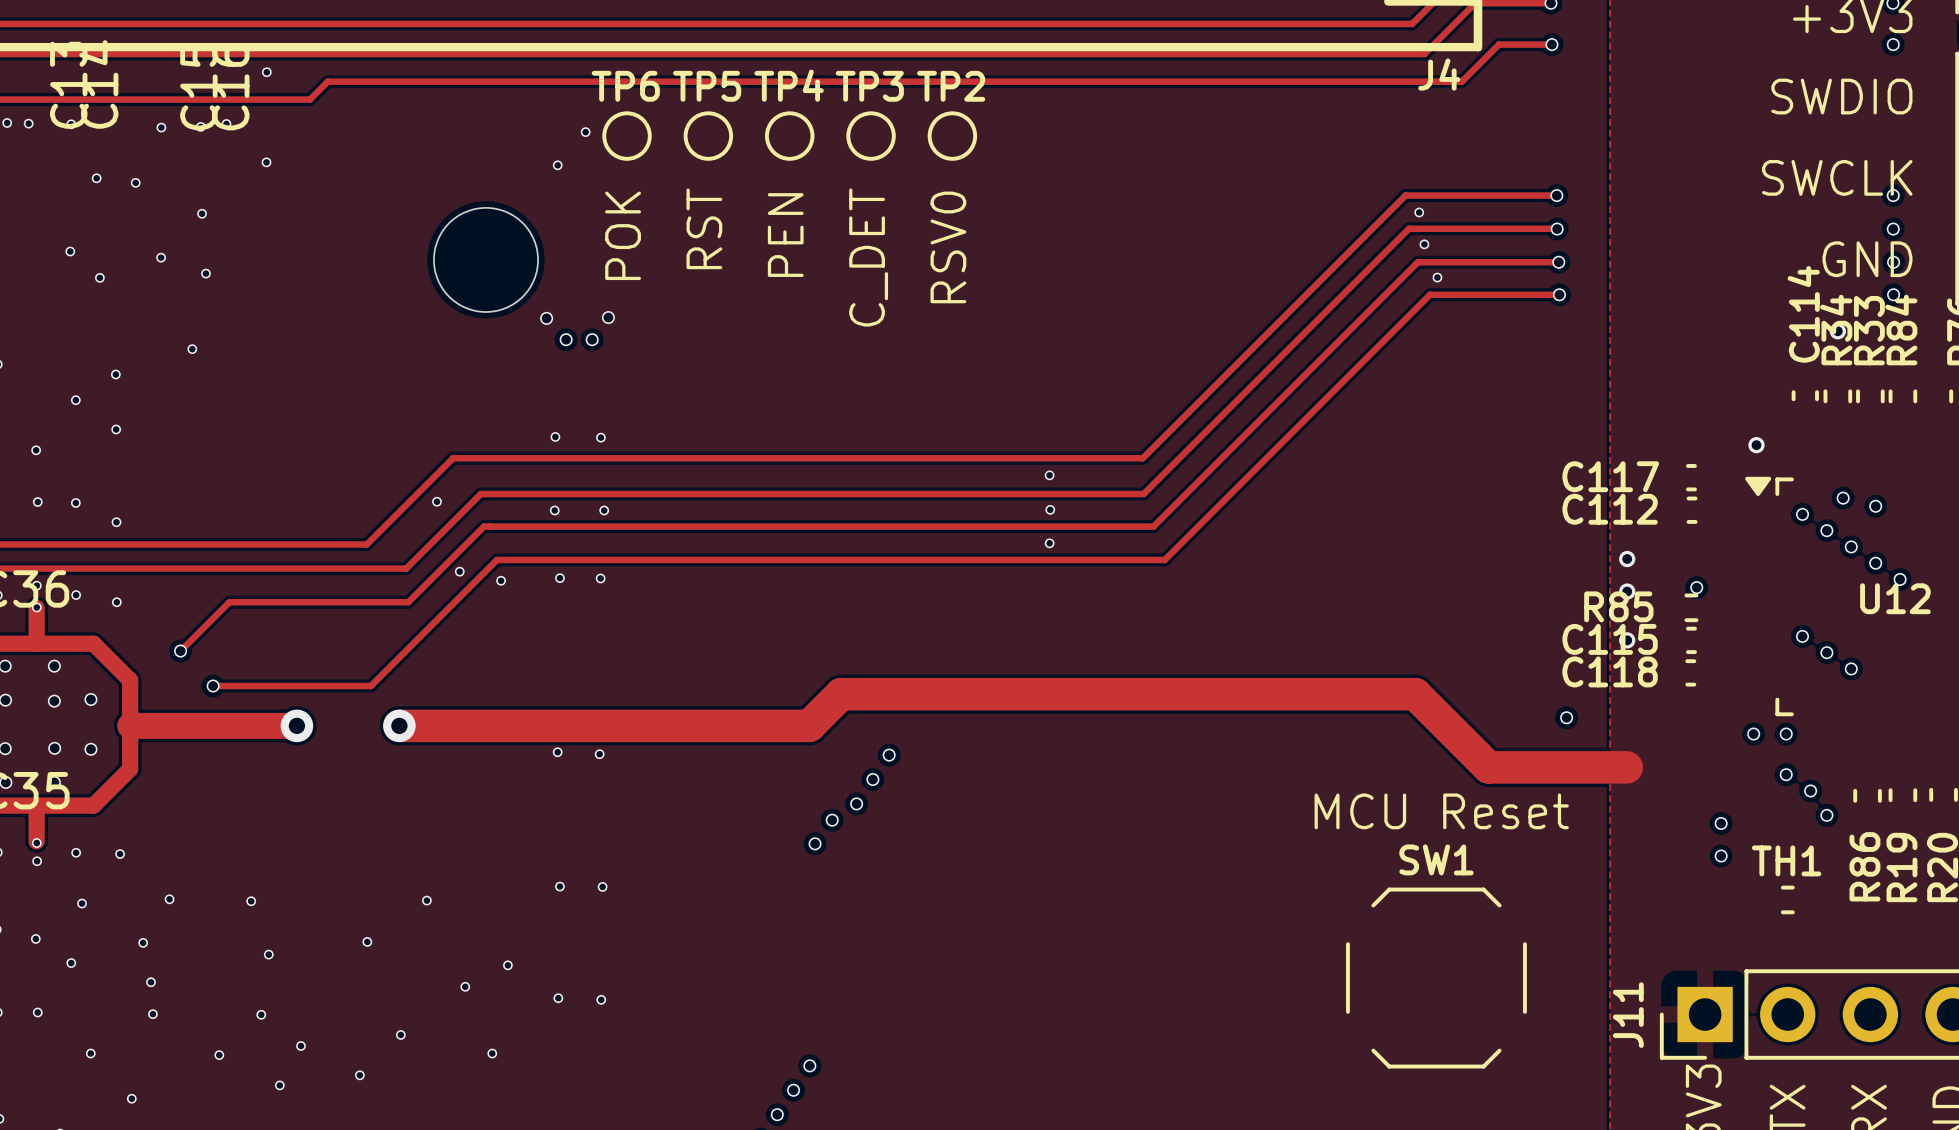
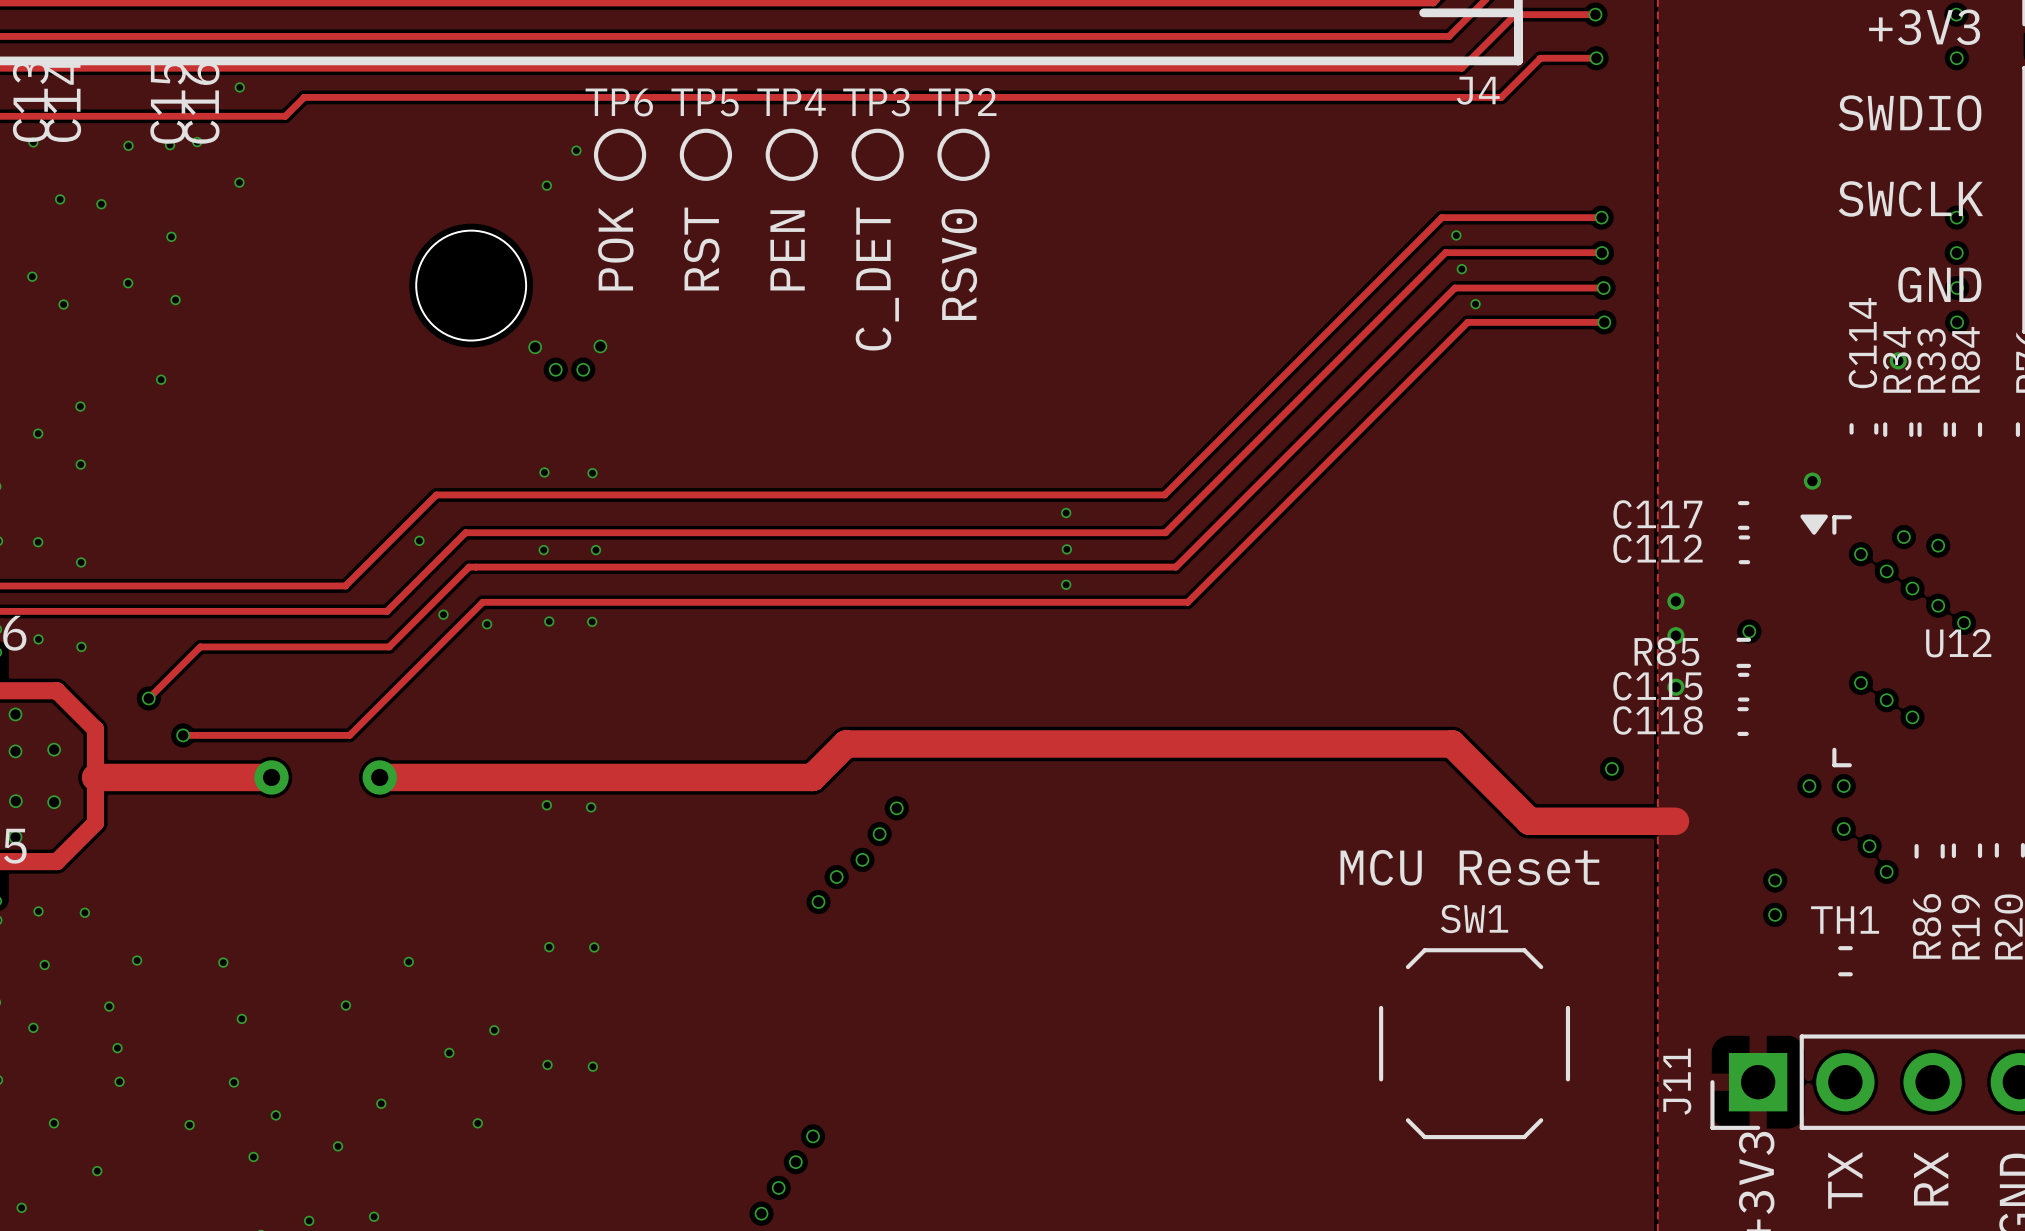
track width: thick (399, 725) (809, 725) (841, 694) (1415, 694) (1488, 767) (1626, 767) -> thin (379, 777) (812, 777) (846, 743) (1452, 743) (1529, 821) (1675, 821)

